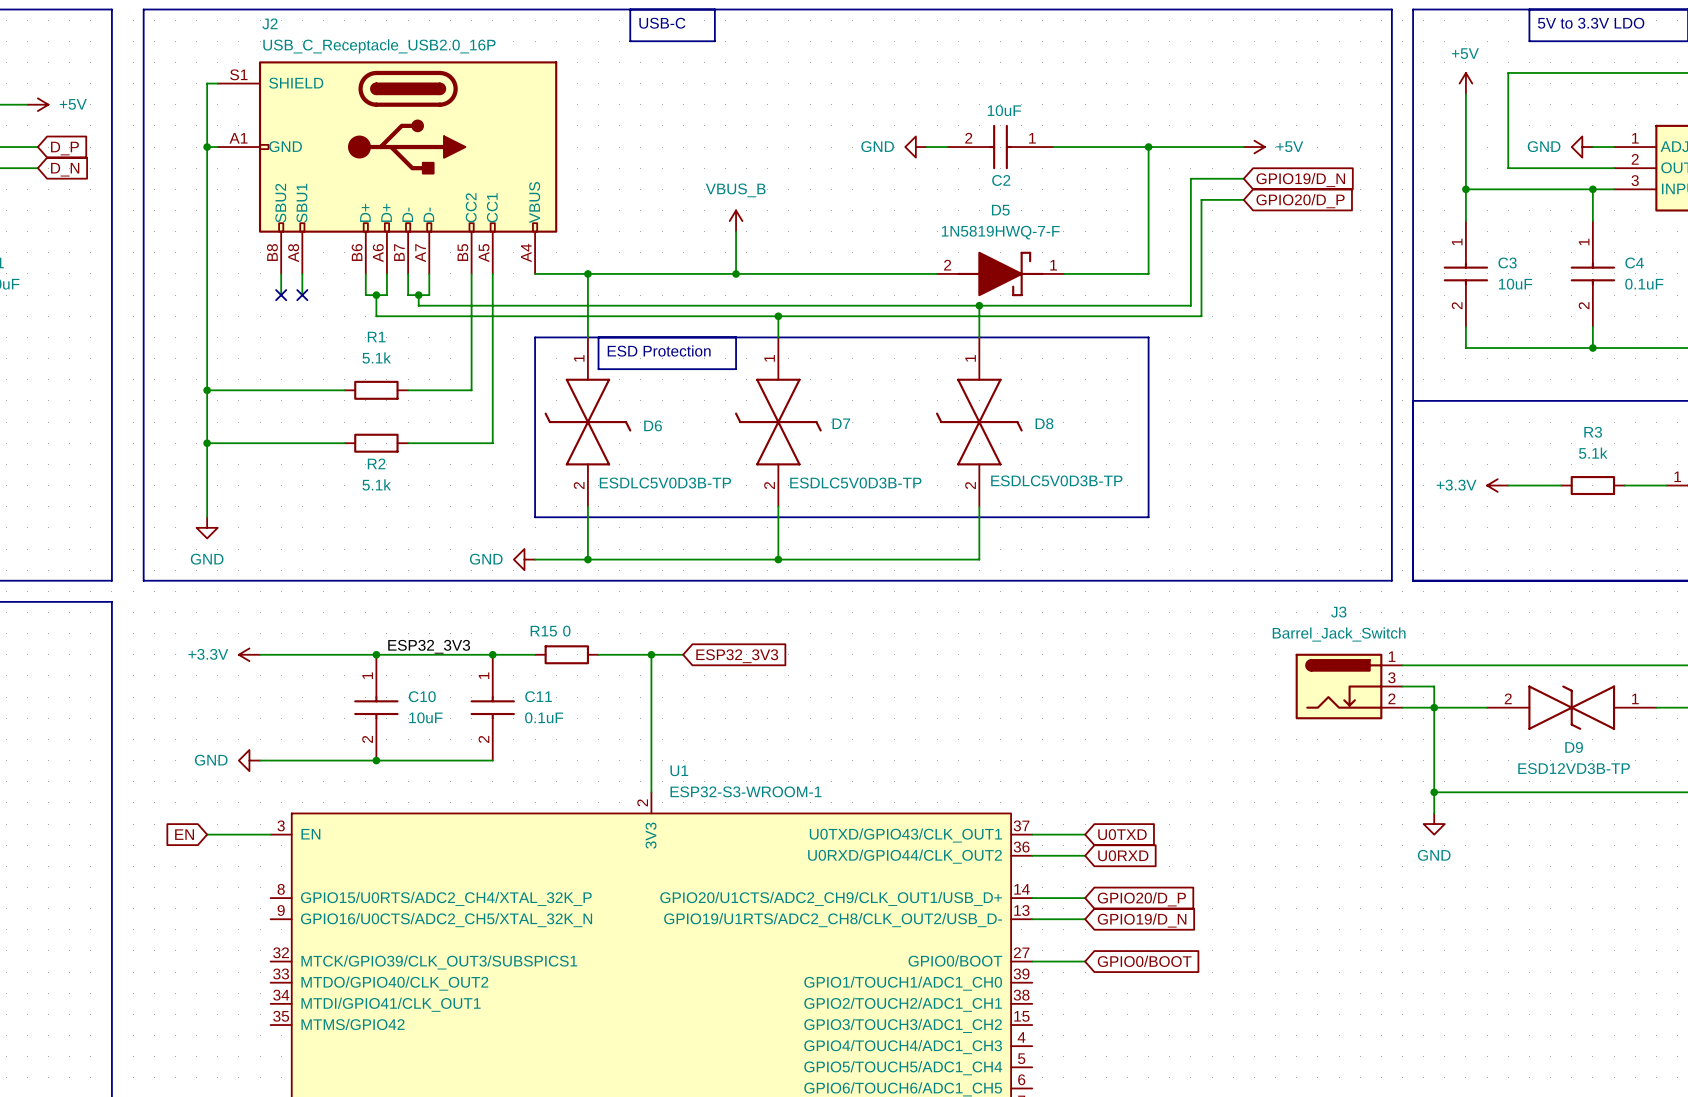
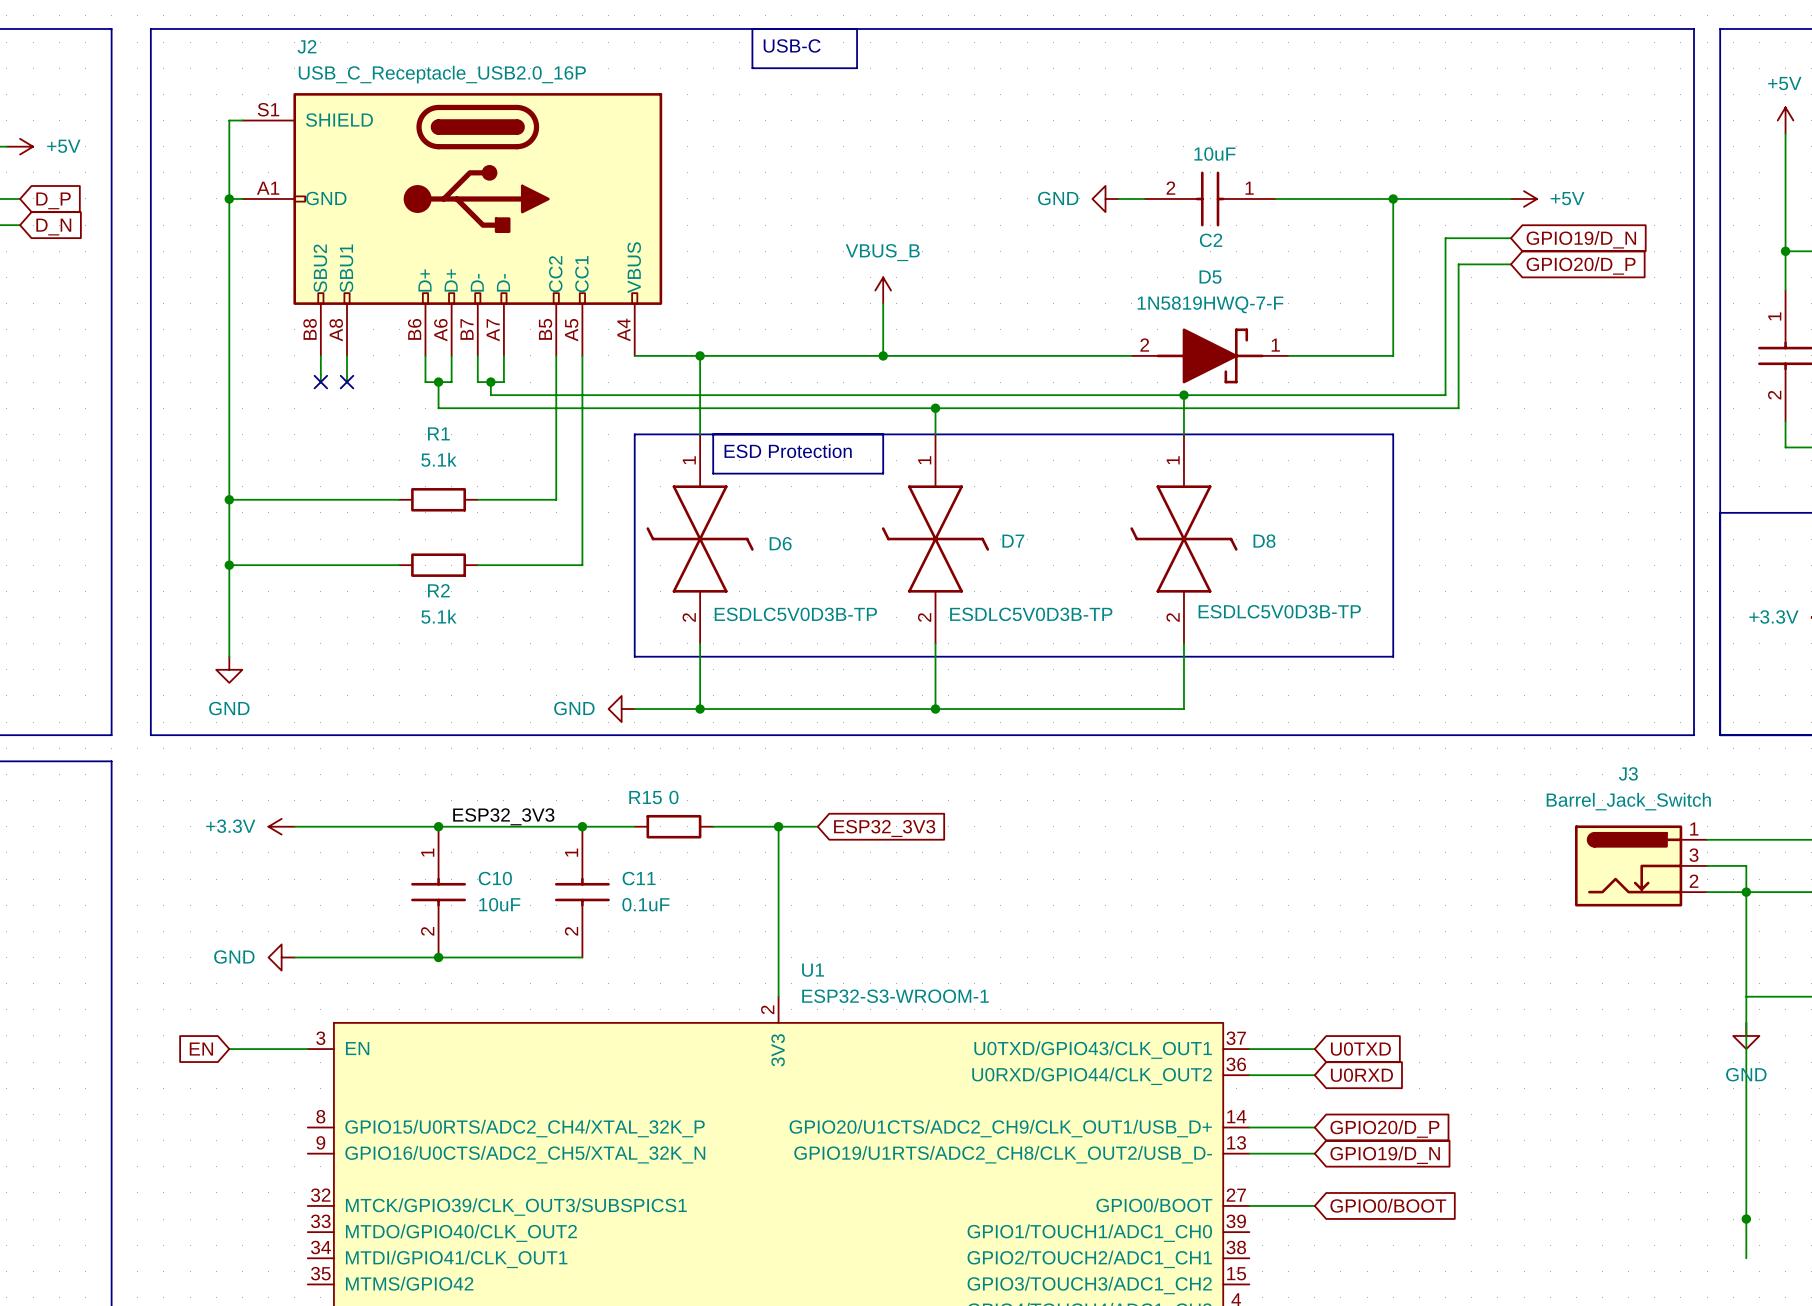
junction: (1434, 792) -> none
wire: none -> (1746, 1022) (1746, 1258)
junction: none -> (1746, 1219)

